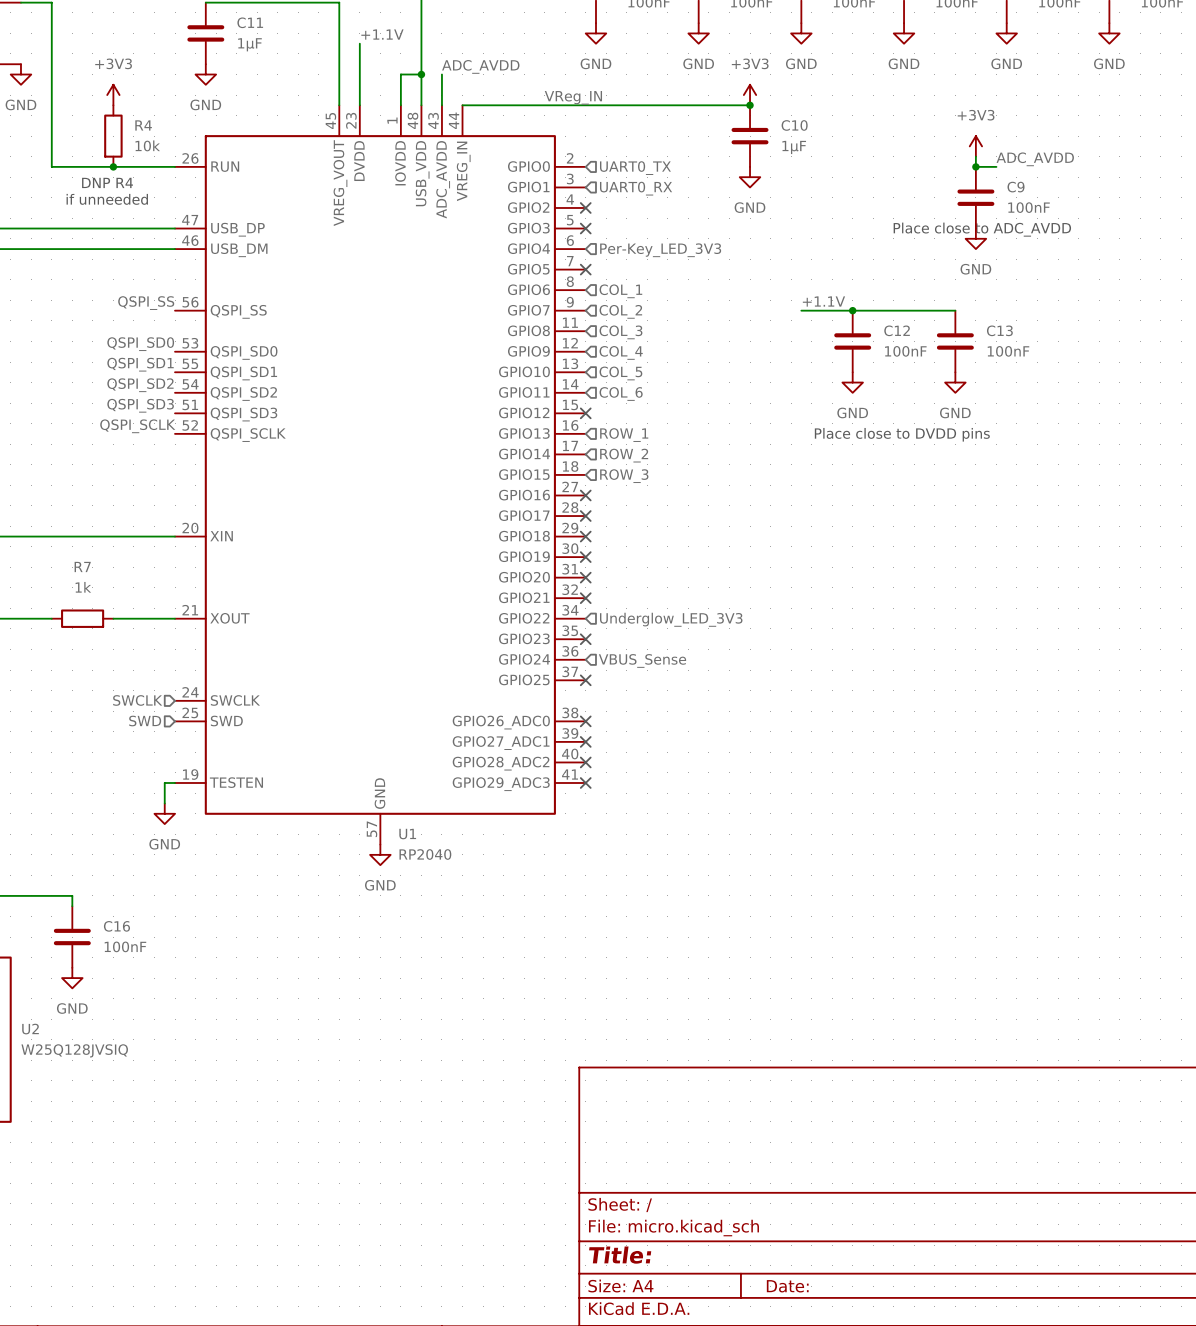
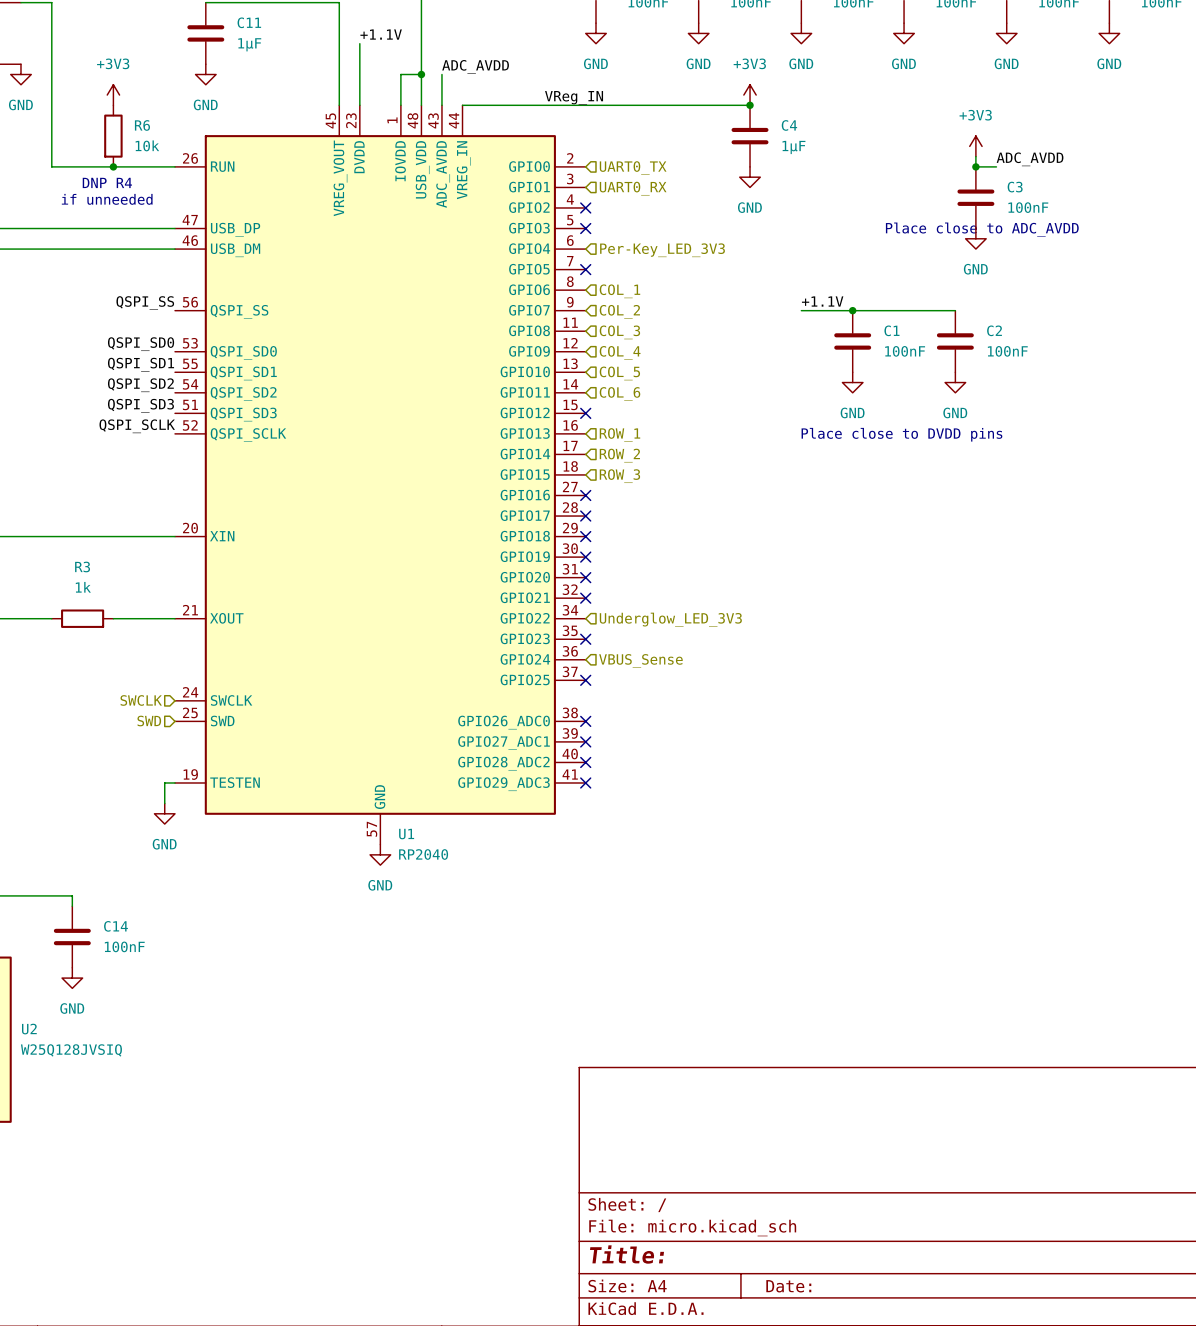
R4 name: R4 (143, 125) -> R6 (142, 125)
C10 name: C10 (794, 125) -> C4 (789, 125)
C9 name: C9 (1016, 187) -> C3 (1015, 187)
C12 name: C12 (897, 330) -> C1 (891, 330)
C13 name: C13 (999, 330) -> C2 (994, 330)
R7 name: R7 (82, 566) -> R3 (82, 566)
C16 name: C16 (116, 926) -> C14 (115, 926)

